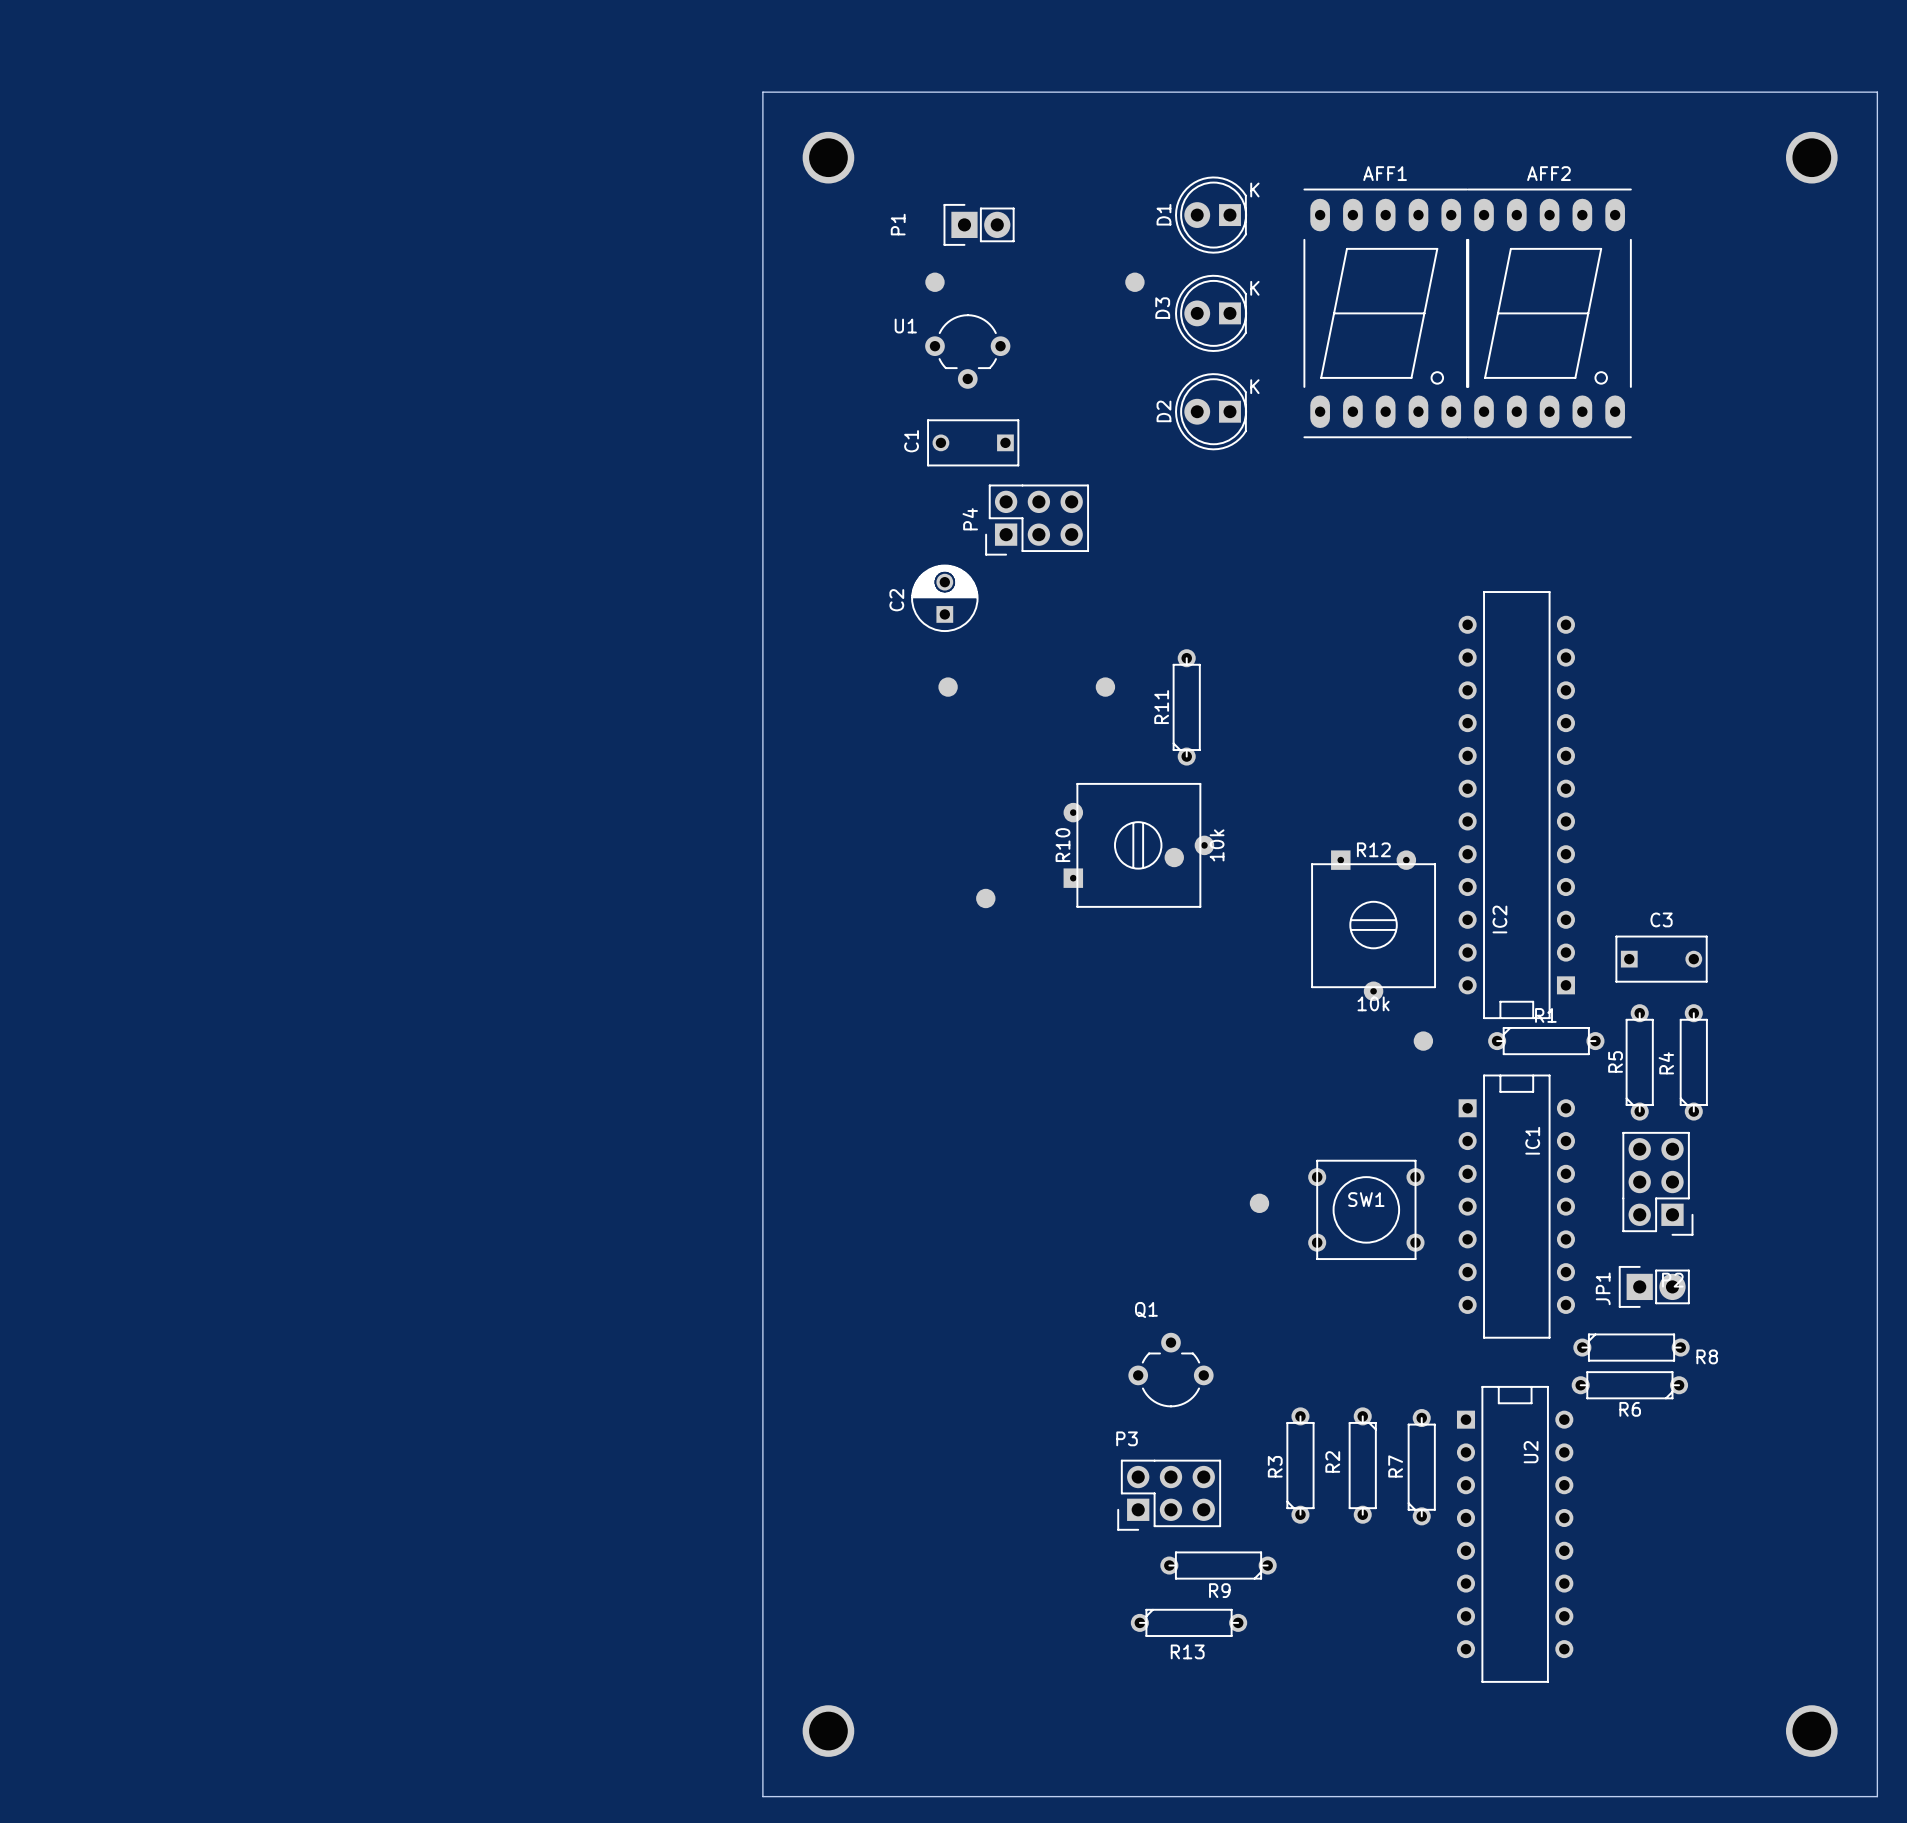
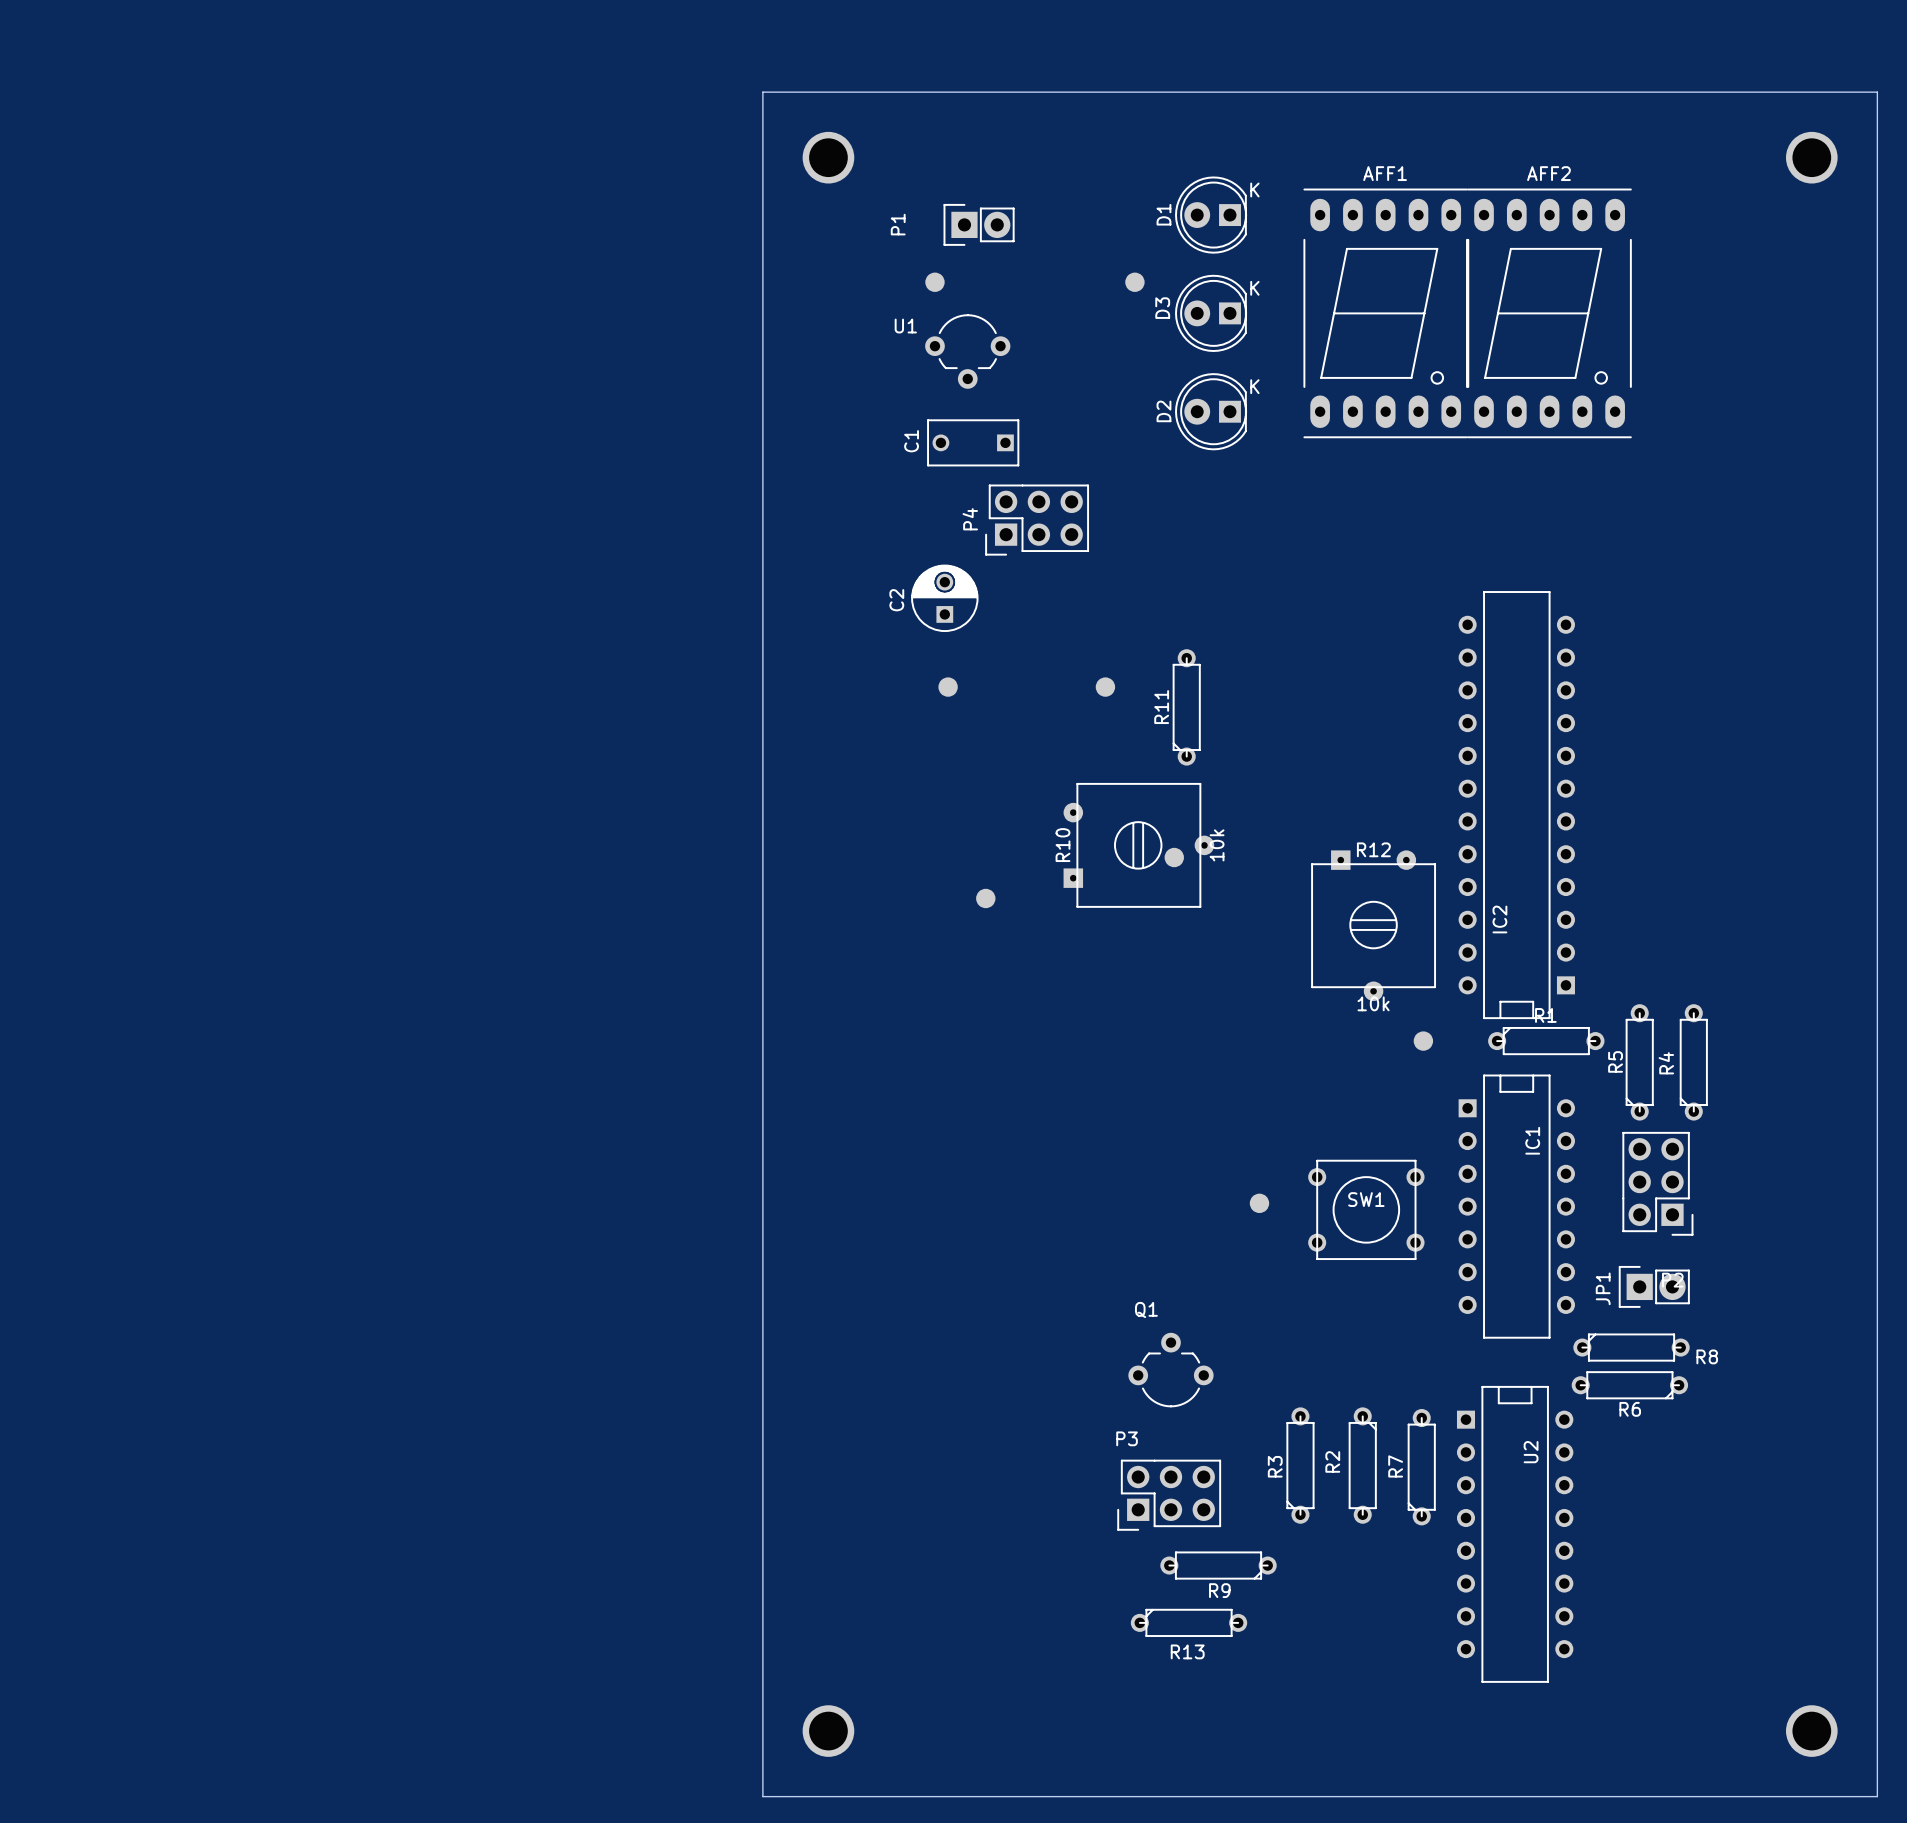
C3: (1661, 959) -> none

